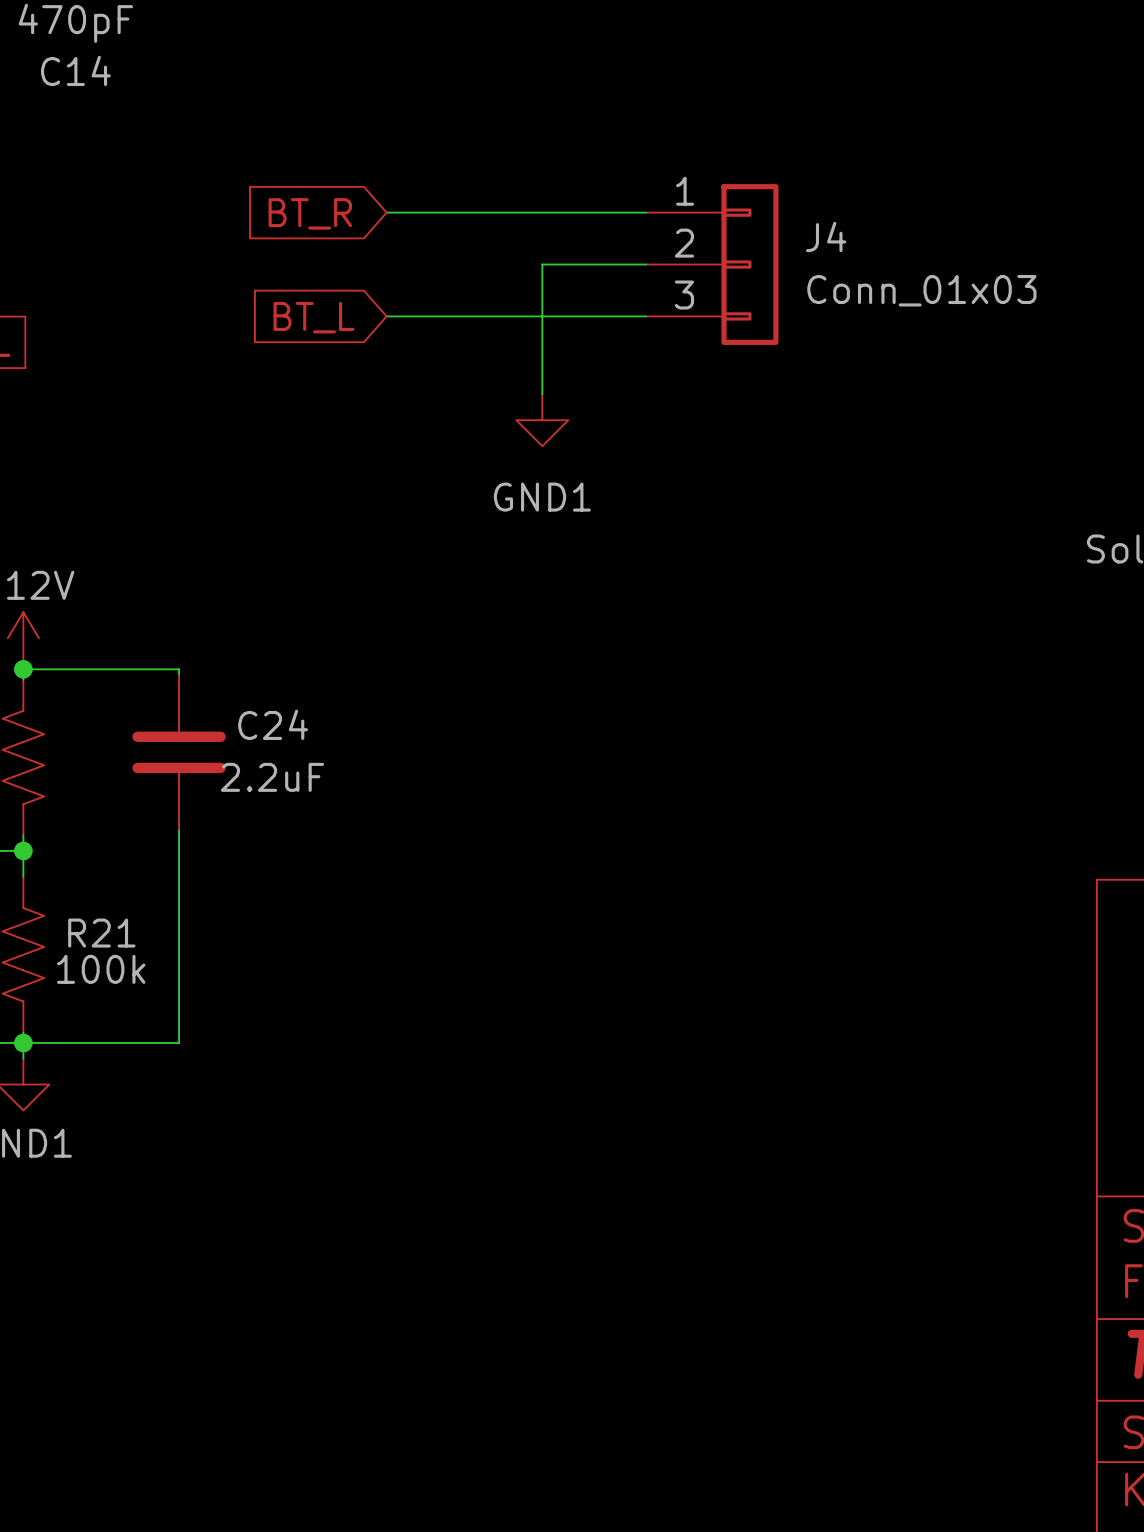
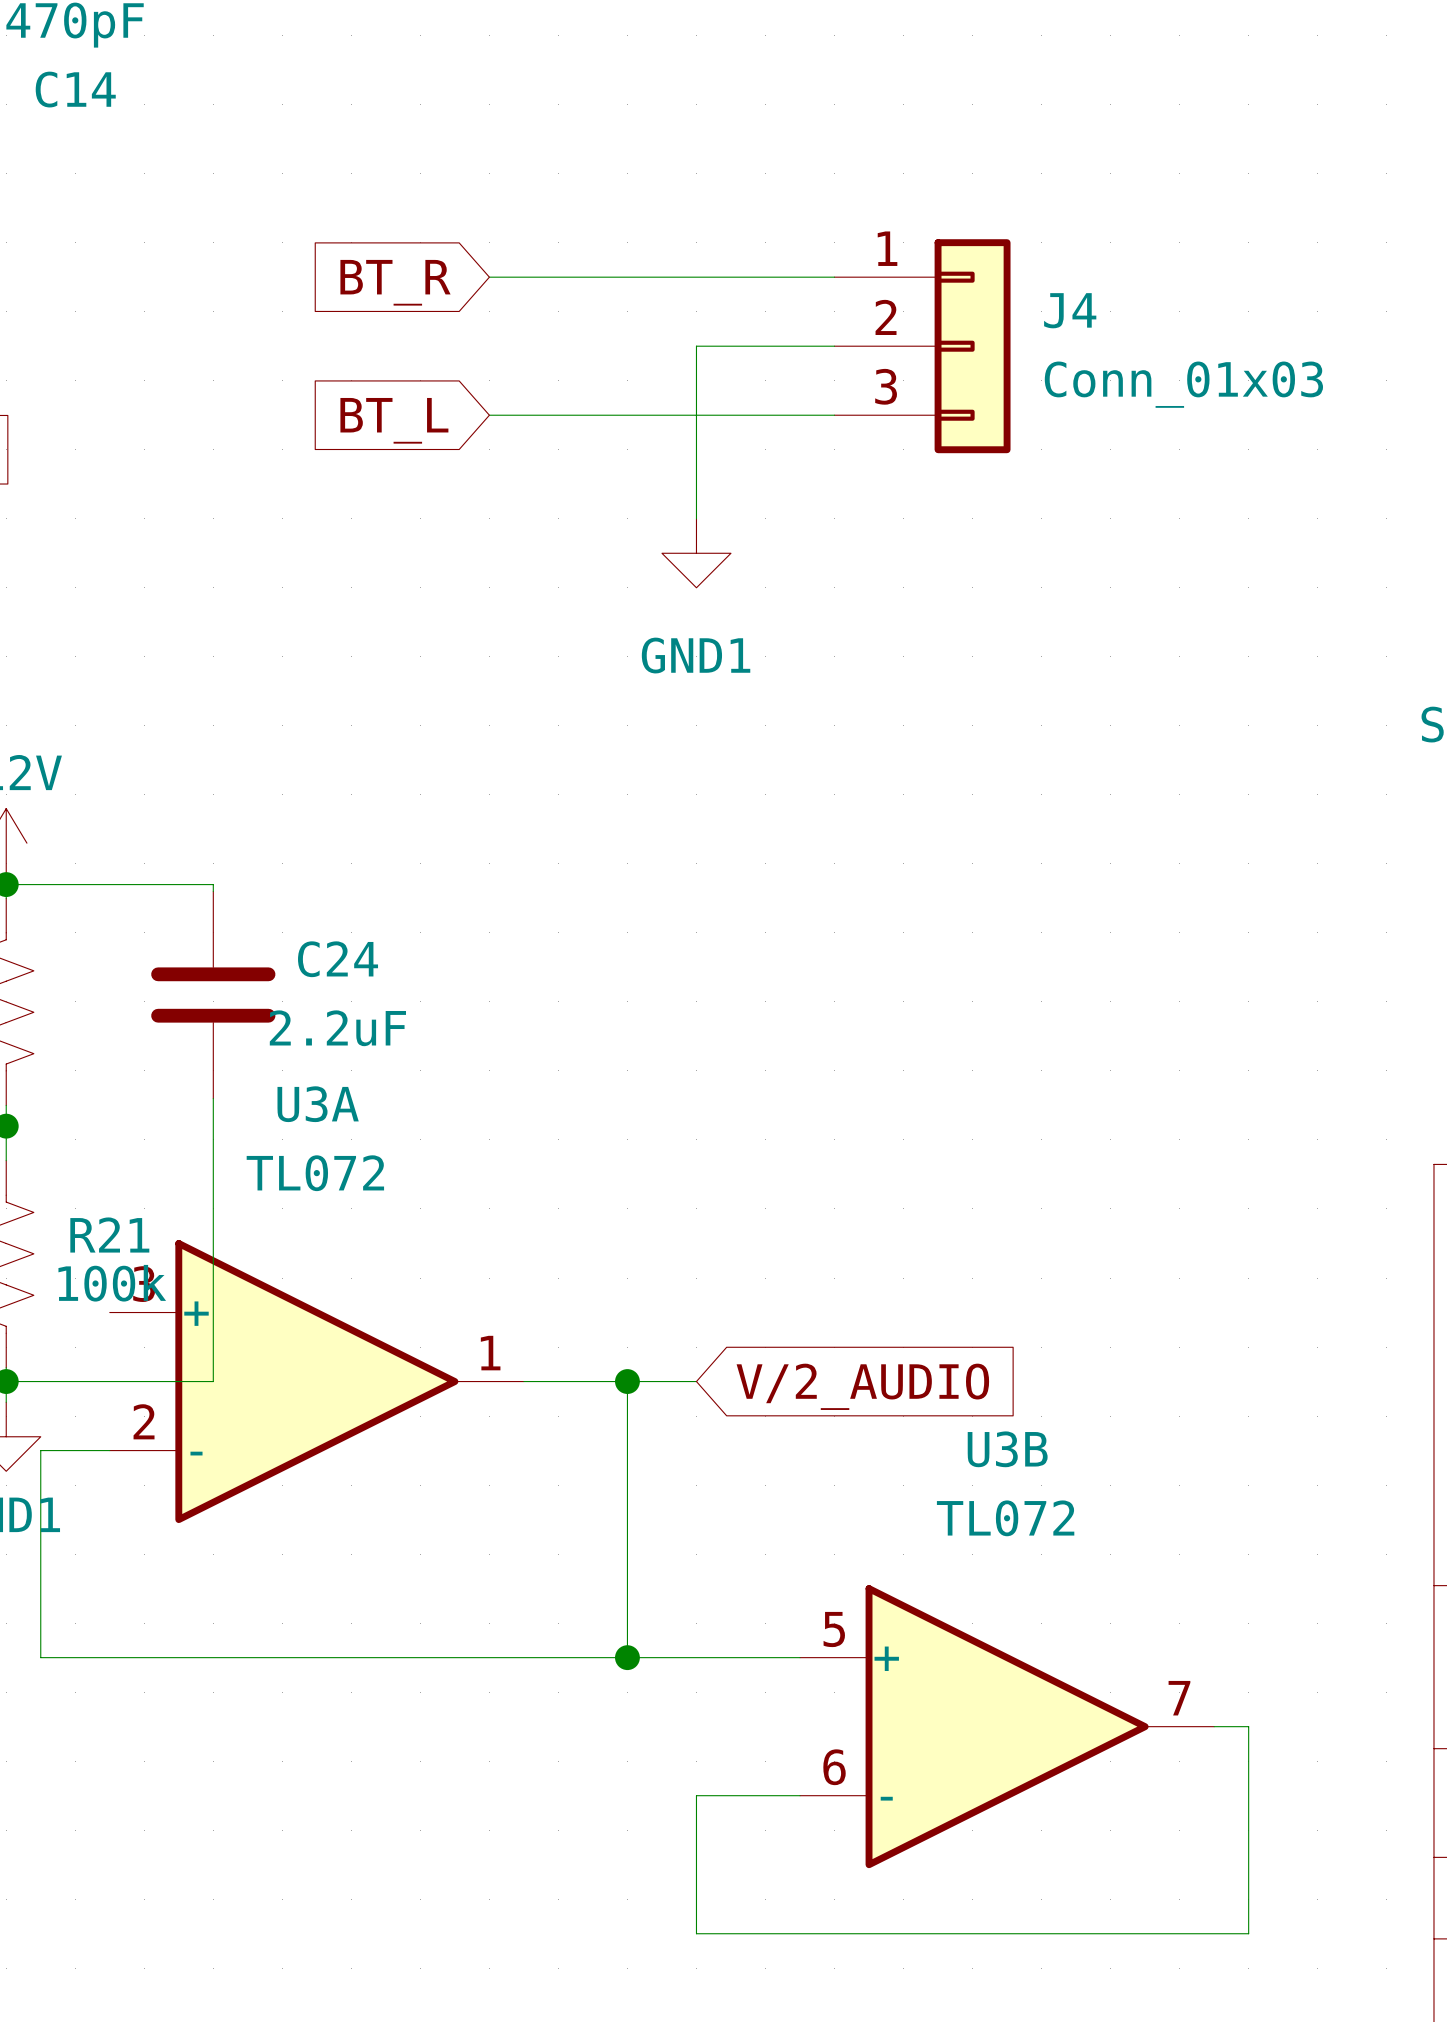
U3A: none -> TL072 (316, 1381)
wire: none -> (523, 1381) (696, 1381)
wire: none -> (627, 1381) (627, 1657)
junction: none -> (627, 1381)
global label: none -> V/2_AUDIO (862, 1386)
wire: none -> (109, 1450) (40, 1450) (40, 1657) (800, 1657)
junction: none -> (627, 1657)
U3B: none -> TL072 (1007, 1726)
wire: none -> (1214, 1726) (1248, 1726) (1248, 1933) (696, 1933) (696, 1795) (800, 1795)

